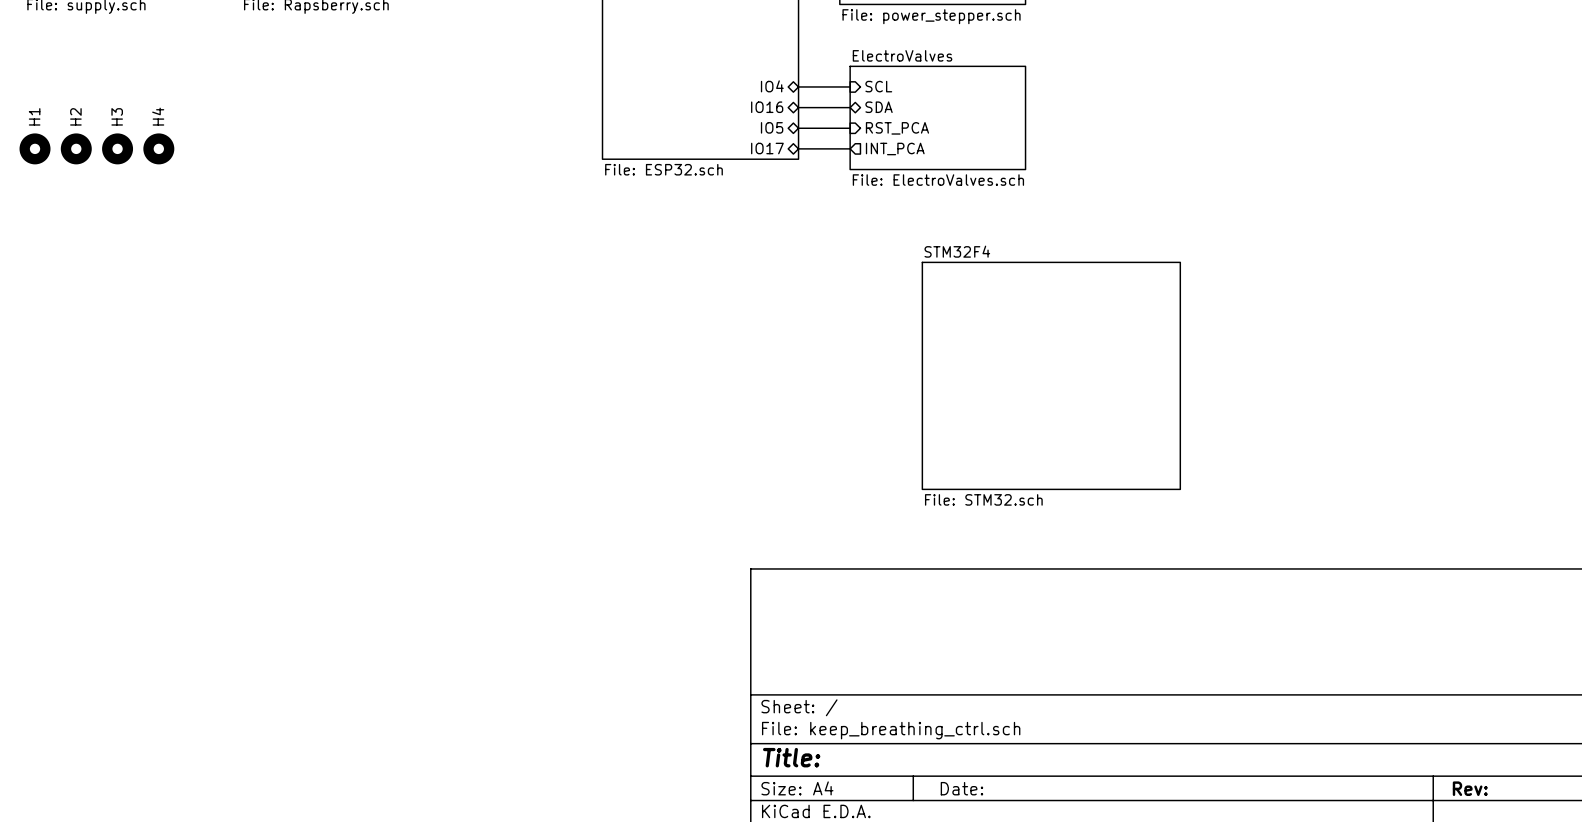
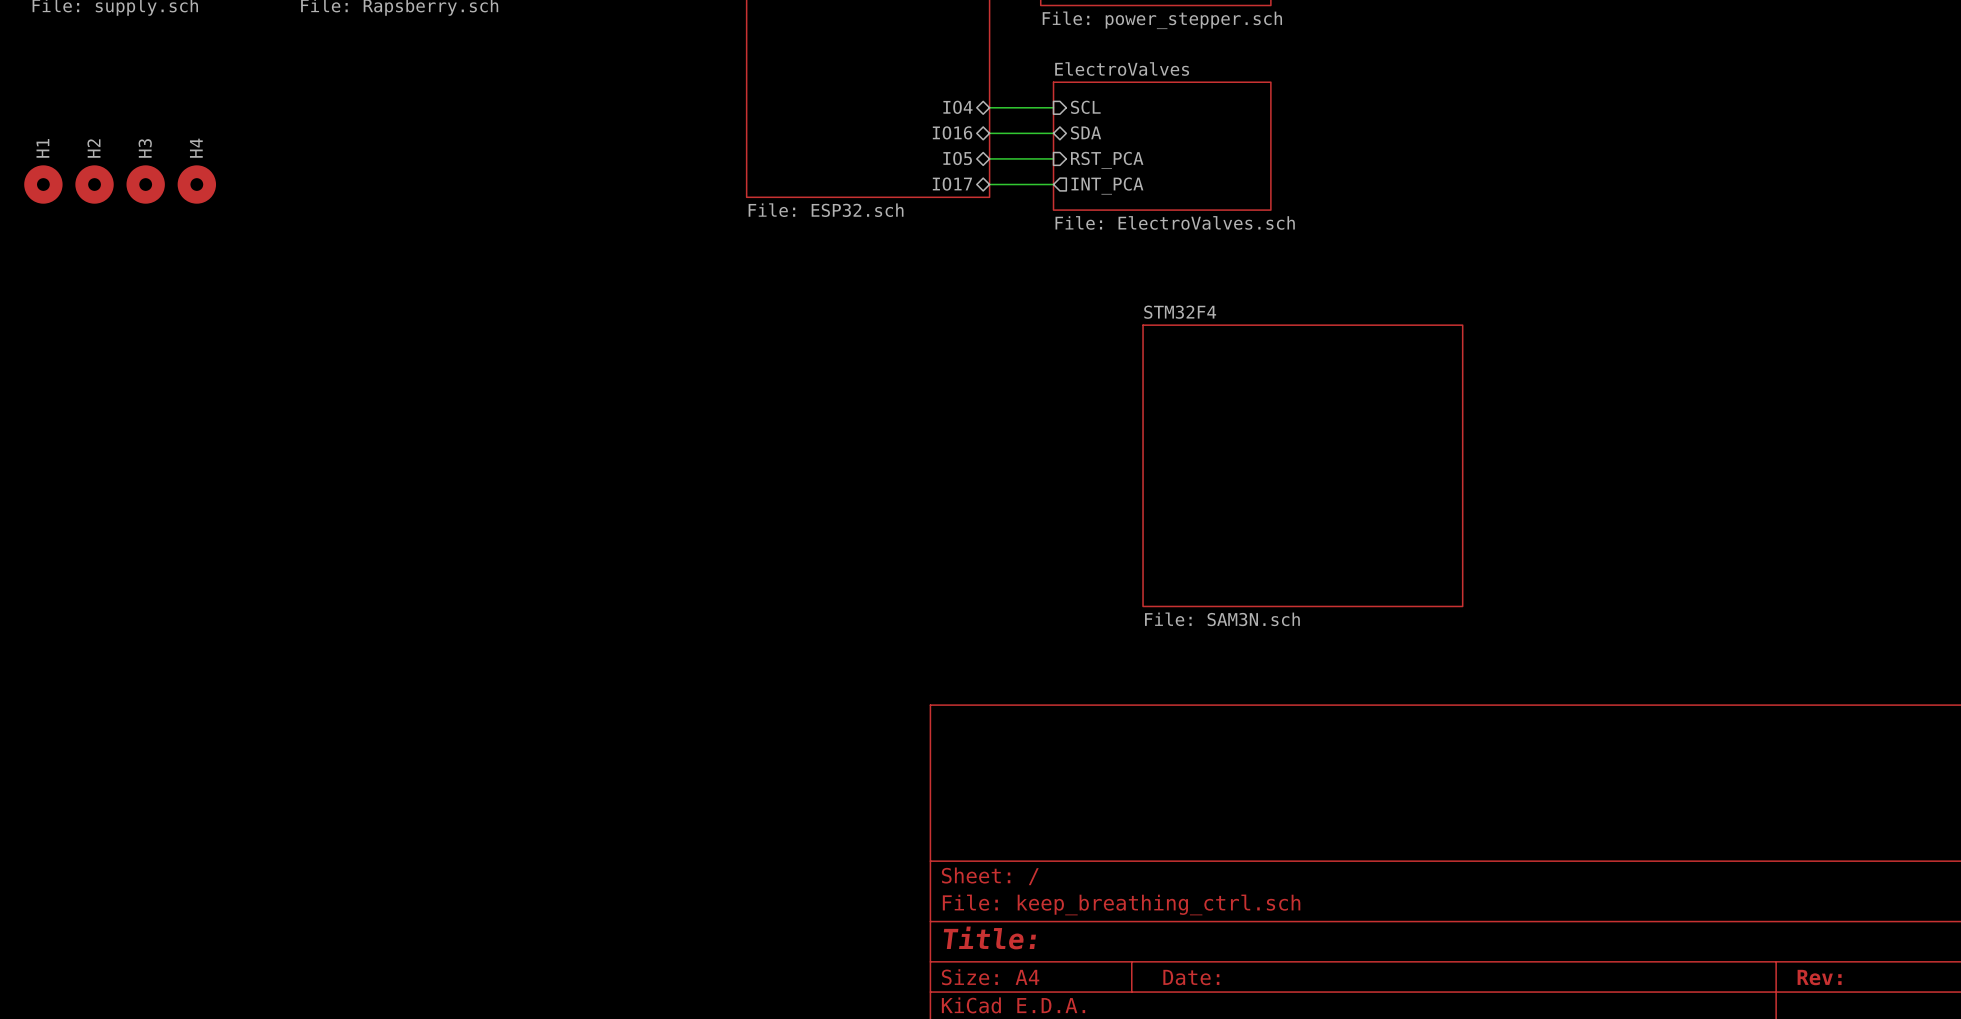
sheet STM32F4 value: File: STM32.sch (983, 499) -> File: SAM3N.sch (1222, 619)

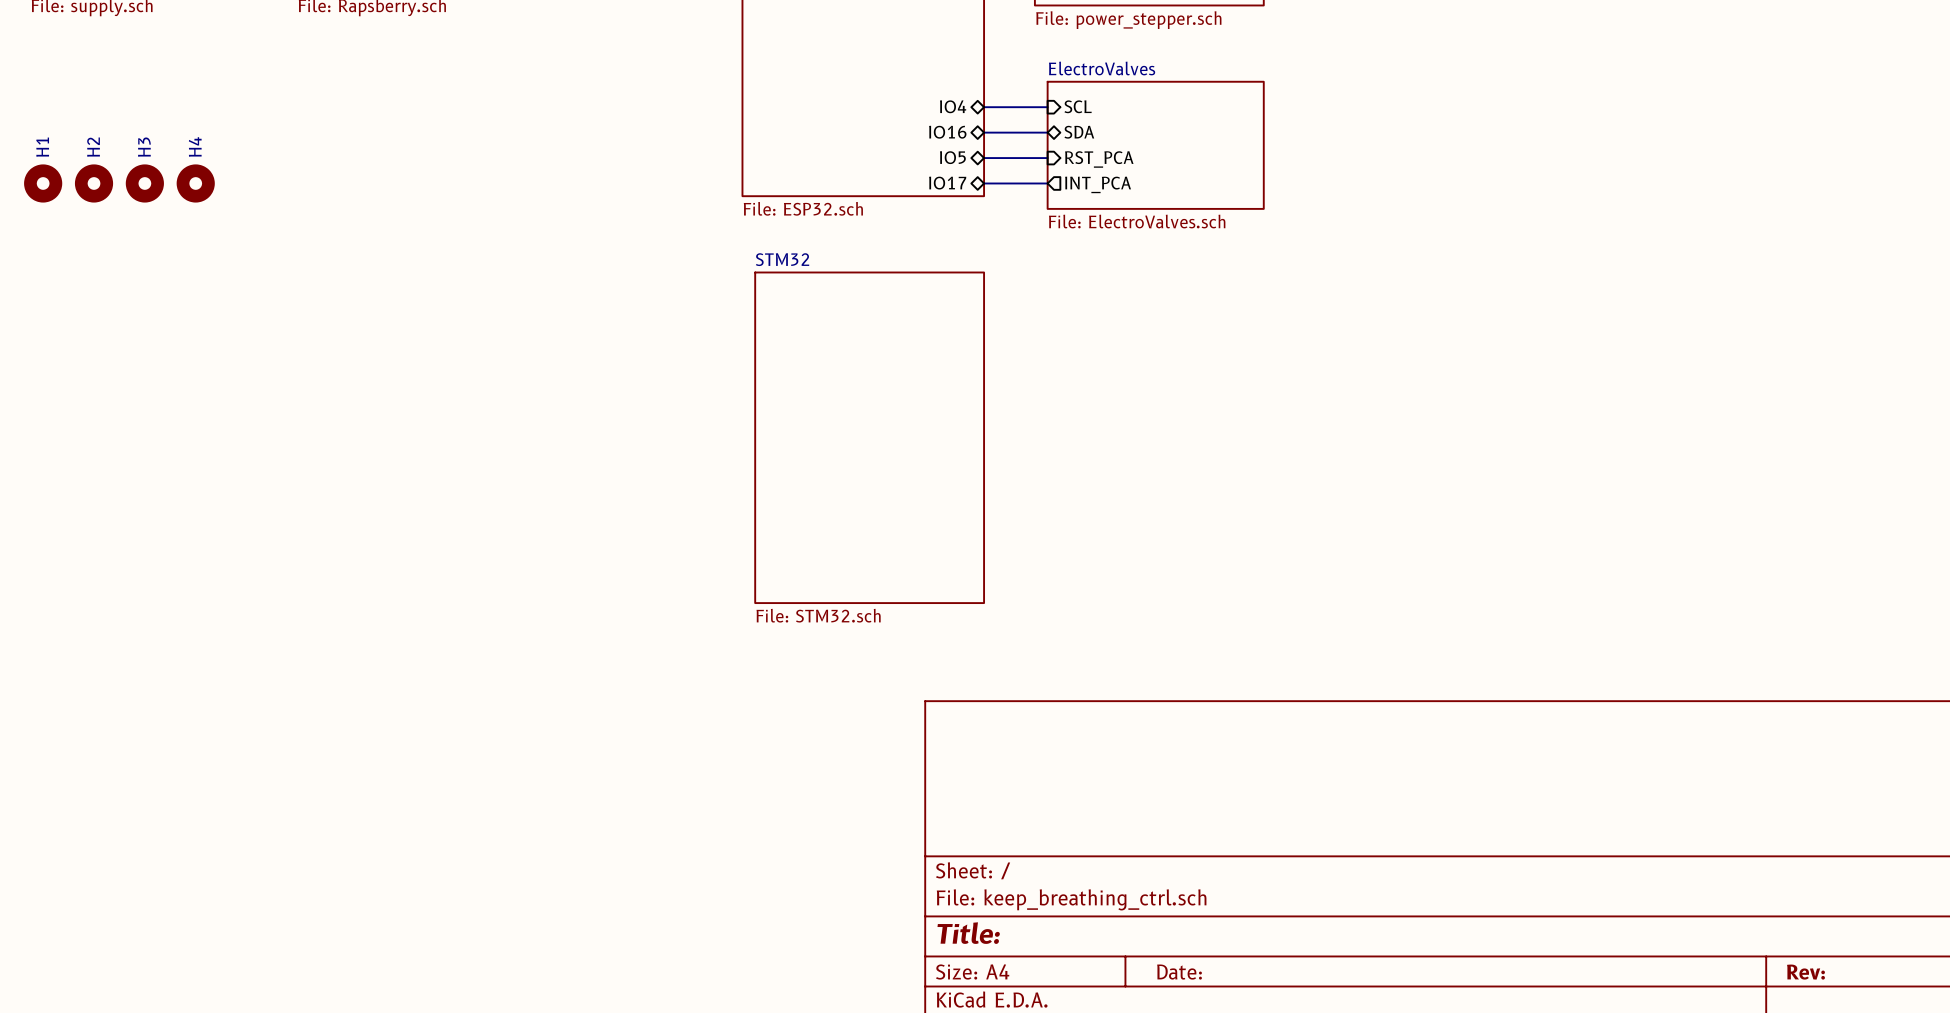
sheet STM32: none -> File: STM32.sch (869, 437)
sheet STM32F4: File: SAM3N.sch (1302, 465) -> none

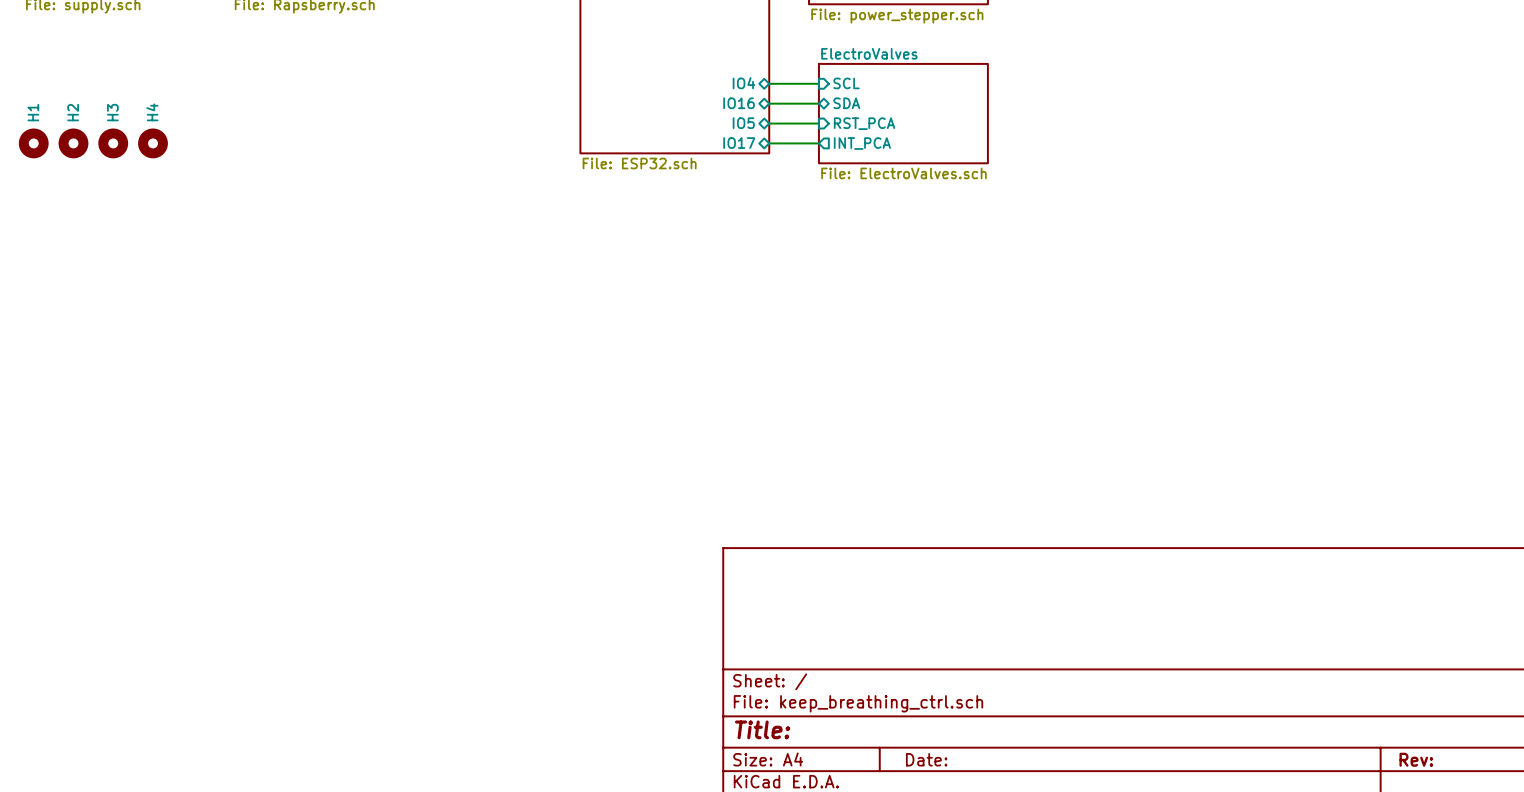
sheet STM32: File: STM32.sch (869, 437) -> none

